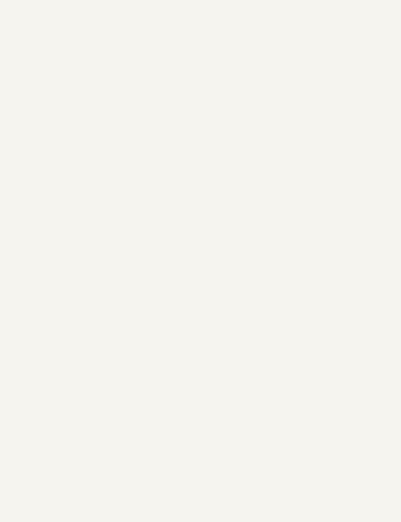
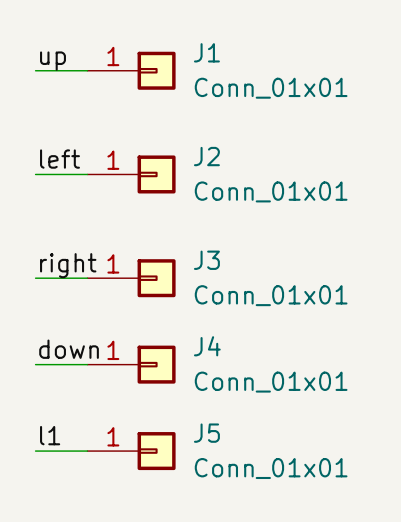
label: none -> up (52, 61)
wire: none -> (35, 70) (87, 70)
J1: none -> Conn_01x01 (131, 70)
label: none -> left (59, 159)
wire: none -> (35, 174) (87, 174)
J2: none -> Conn_01x01 (131, 174)
label: none -> right (68, 265)
wire: none -> (35, 278) (87, 278)
J3: none -> Conn_01x01 (131, 278)
label: none -> down (69, 349)
wire: none -> (35, 364) (87, 364)
J4: none -> Conn_01x01 (131, 364)
label: none -> l1 (50, 435)
wire: none -> (35, 451) (87, 451)
J5: none -> Conn_01x01 (131, 451)

